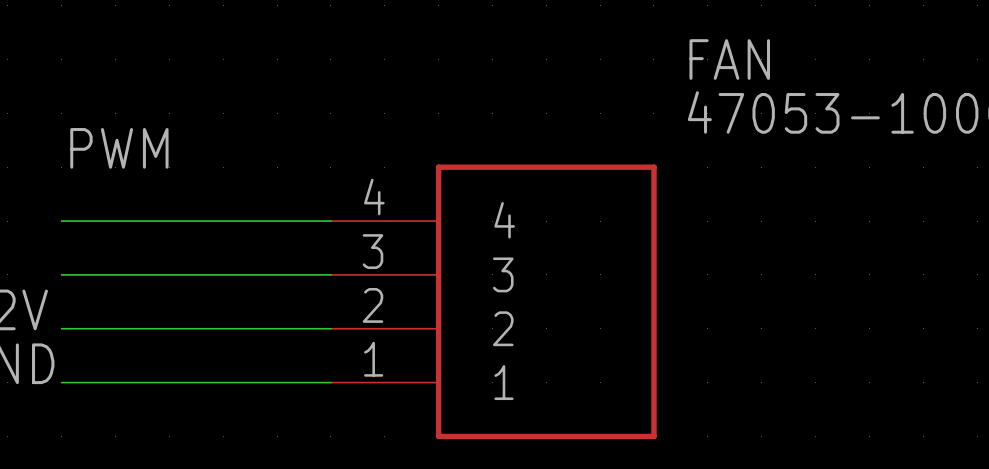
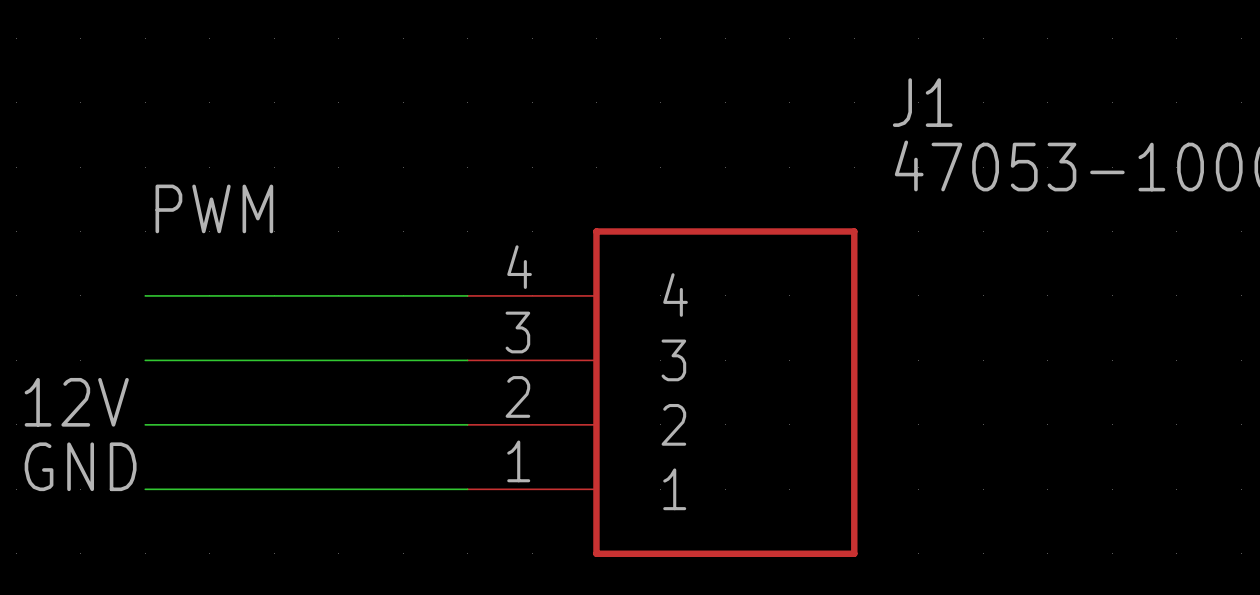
FAN name: FAN (729, 59) -> J1 (922, 102)

